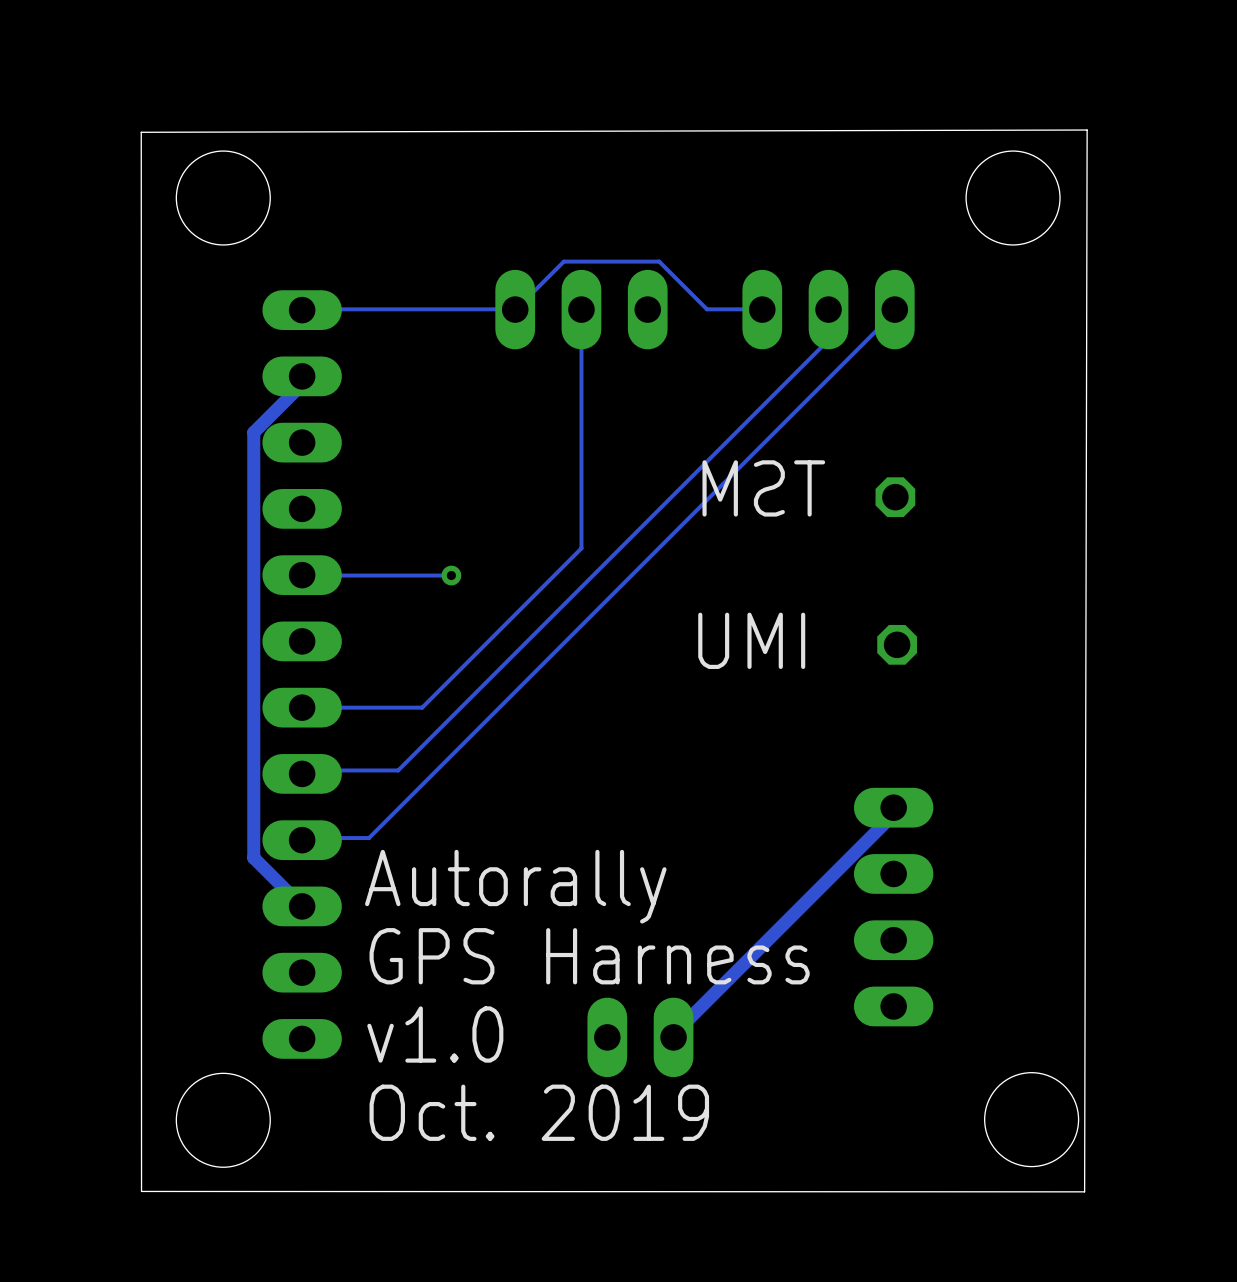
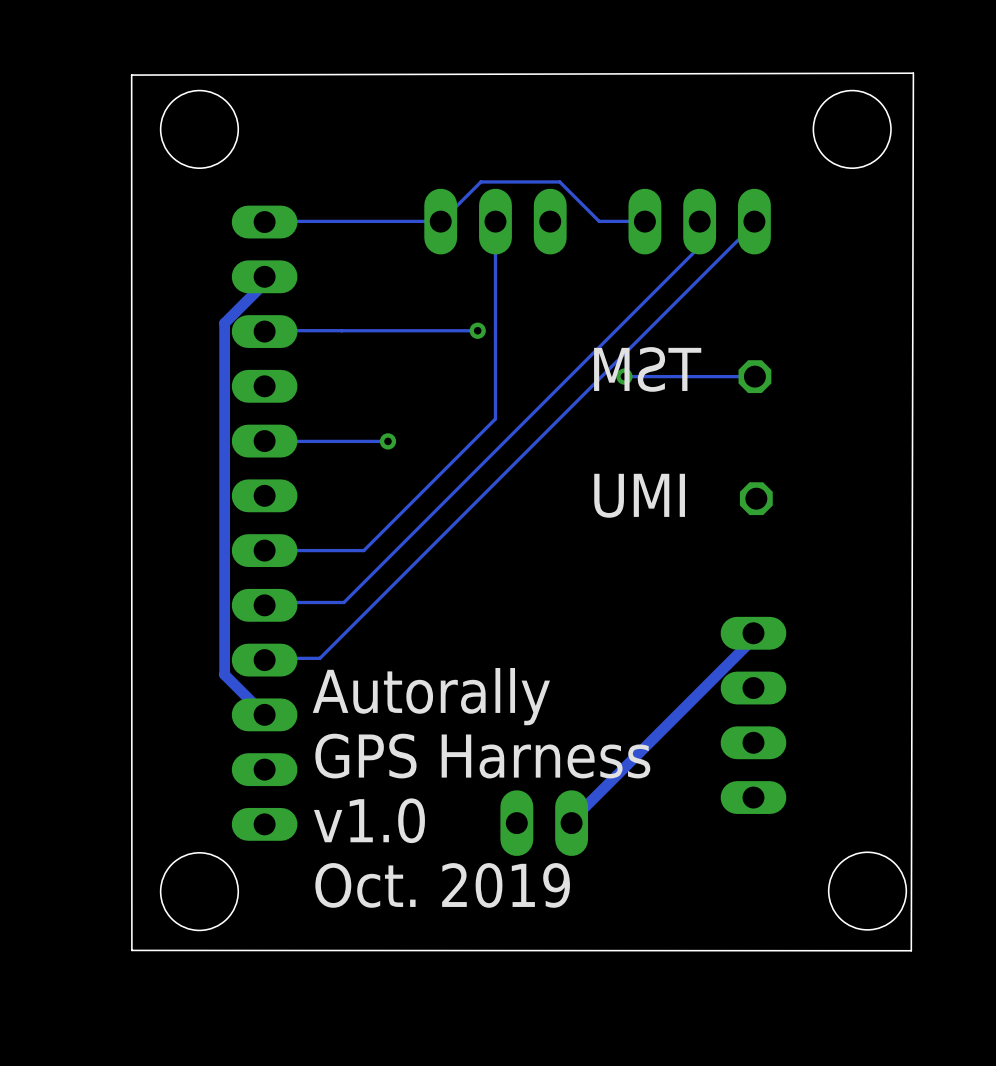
track: none -> (477, 330) (264, 331)
via: none -> (477, 330)
via: none -> (624, 376)
track: none -> (754, 376) (624, 376)

